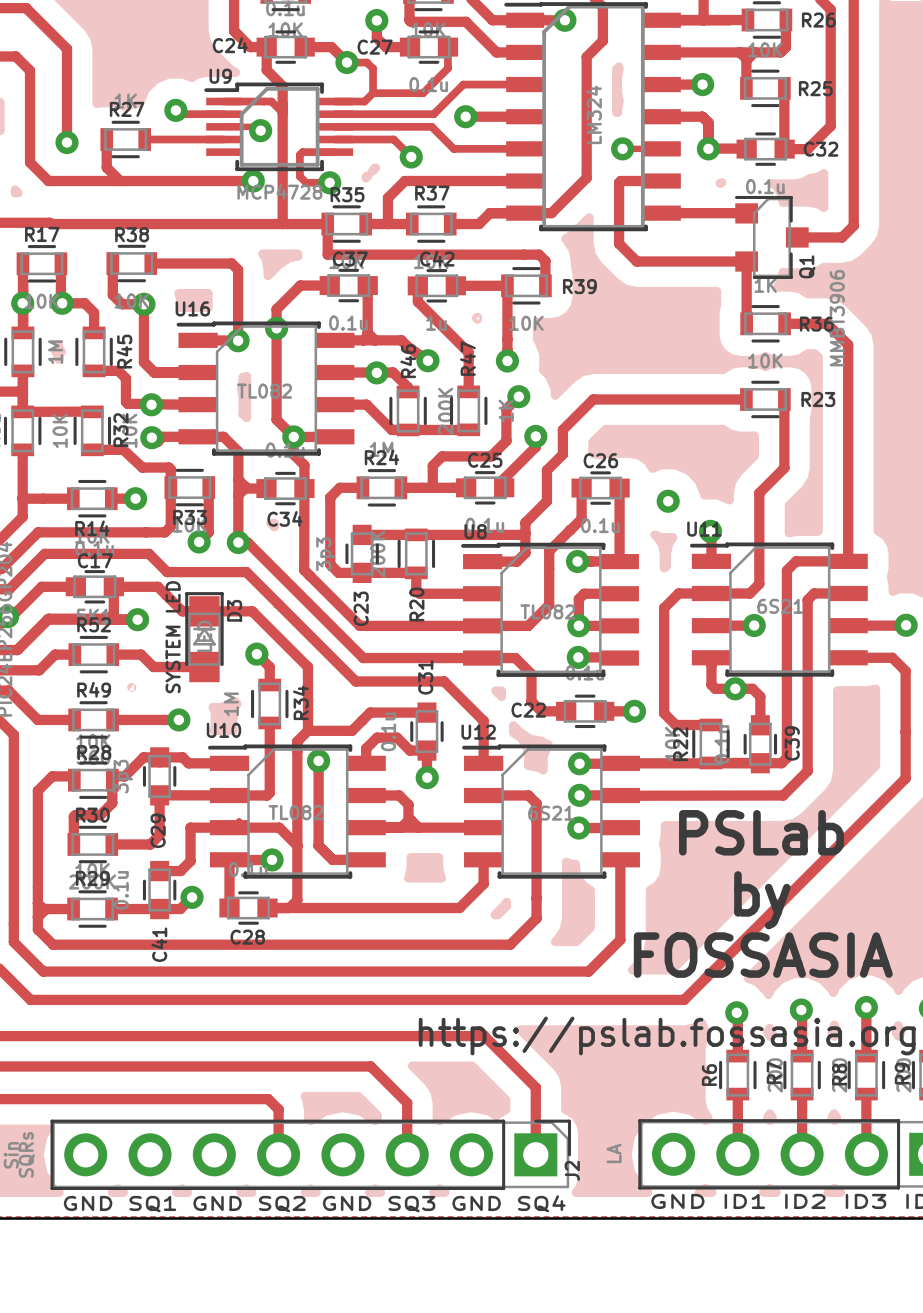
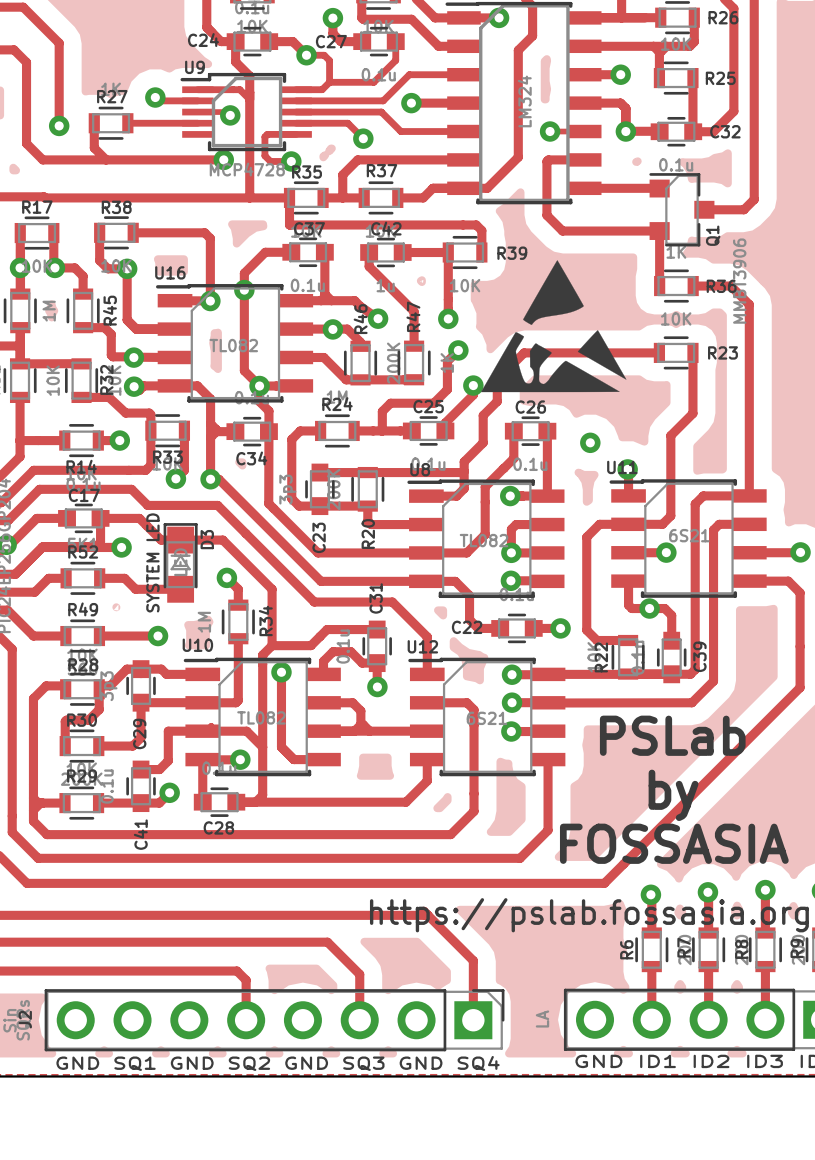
drawing: none -> [481, 260, 627, 393]
J2 name position: J2 (572, 1170) -> J2 (25, 1019)

